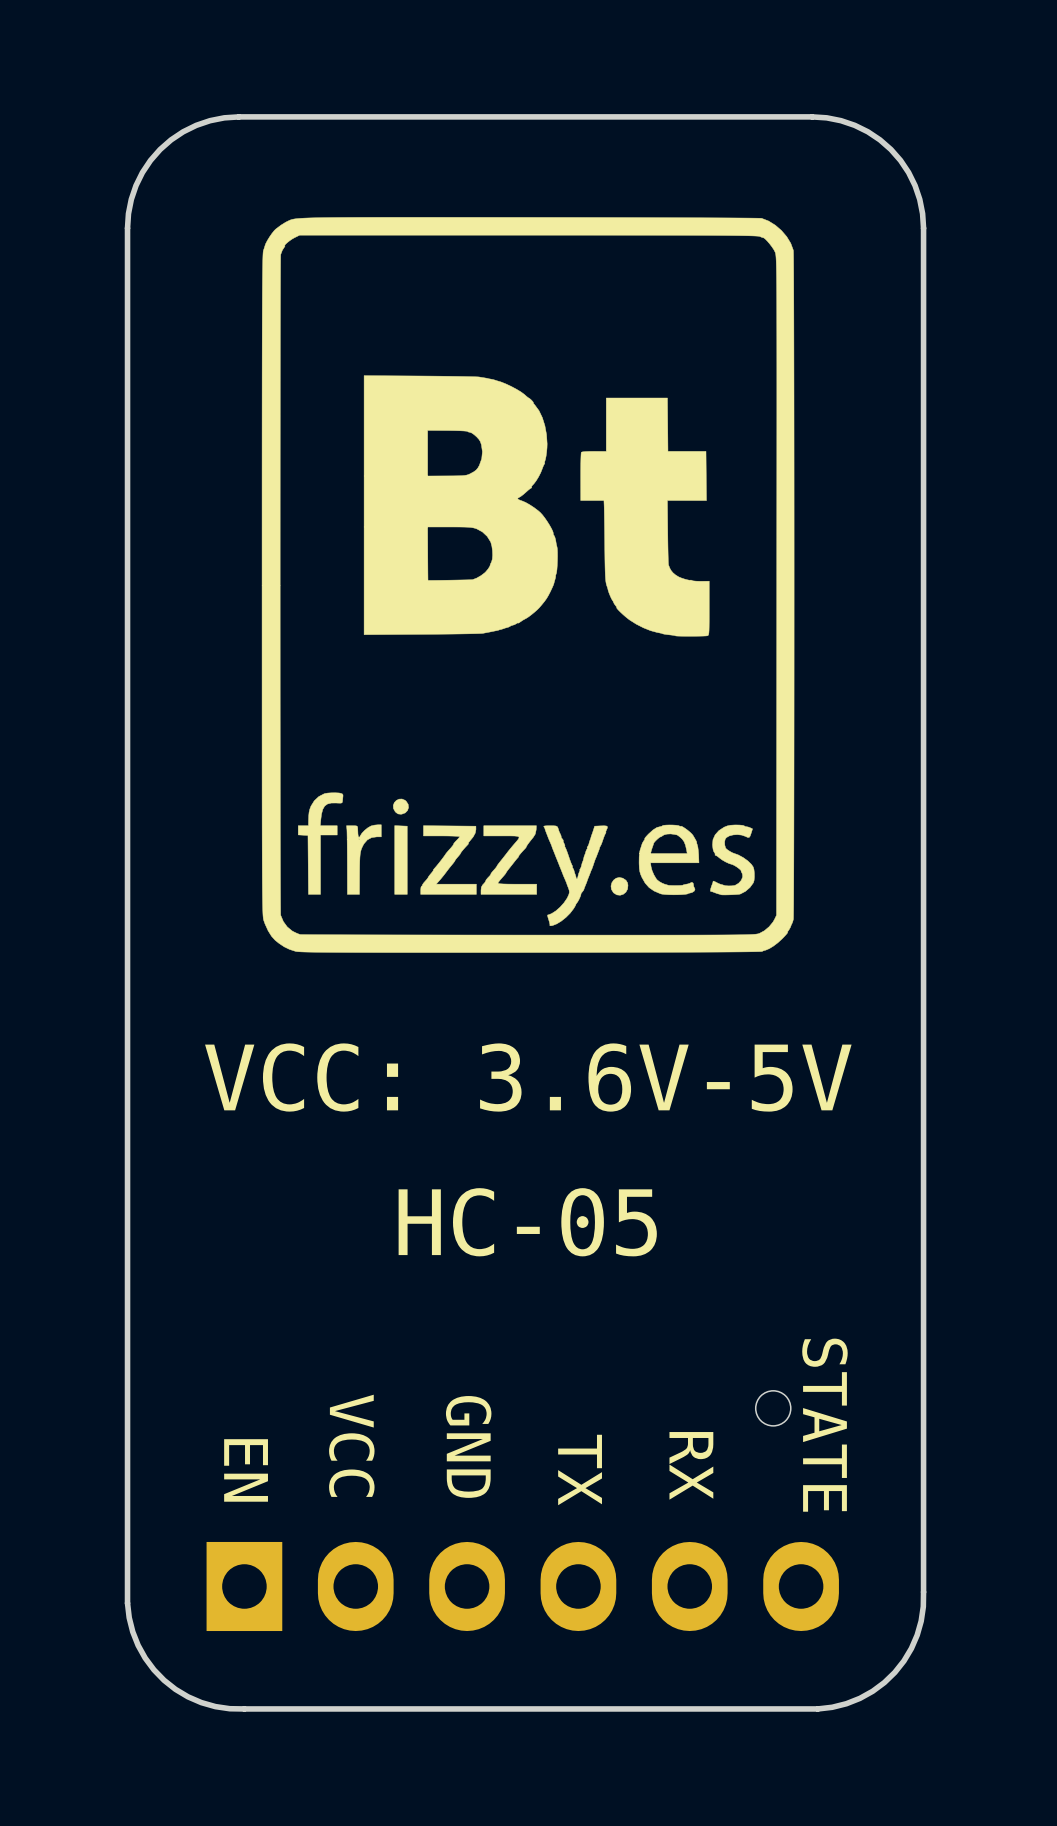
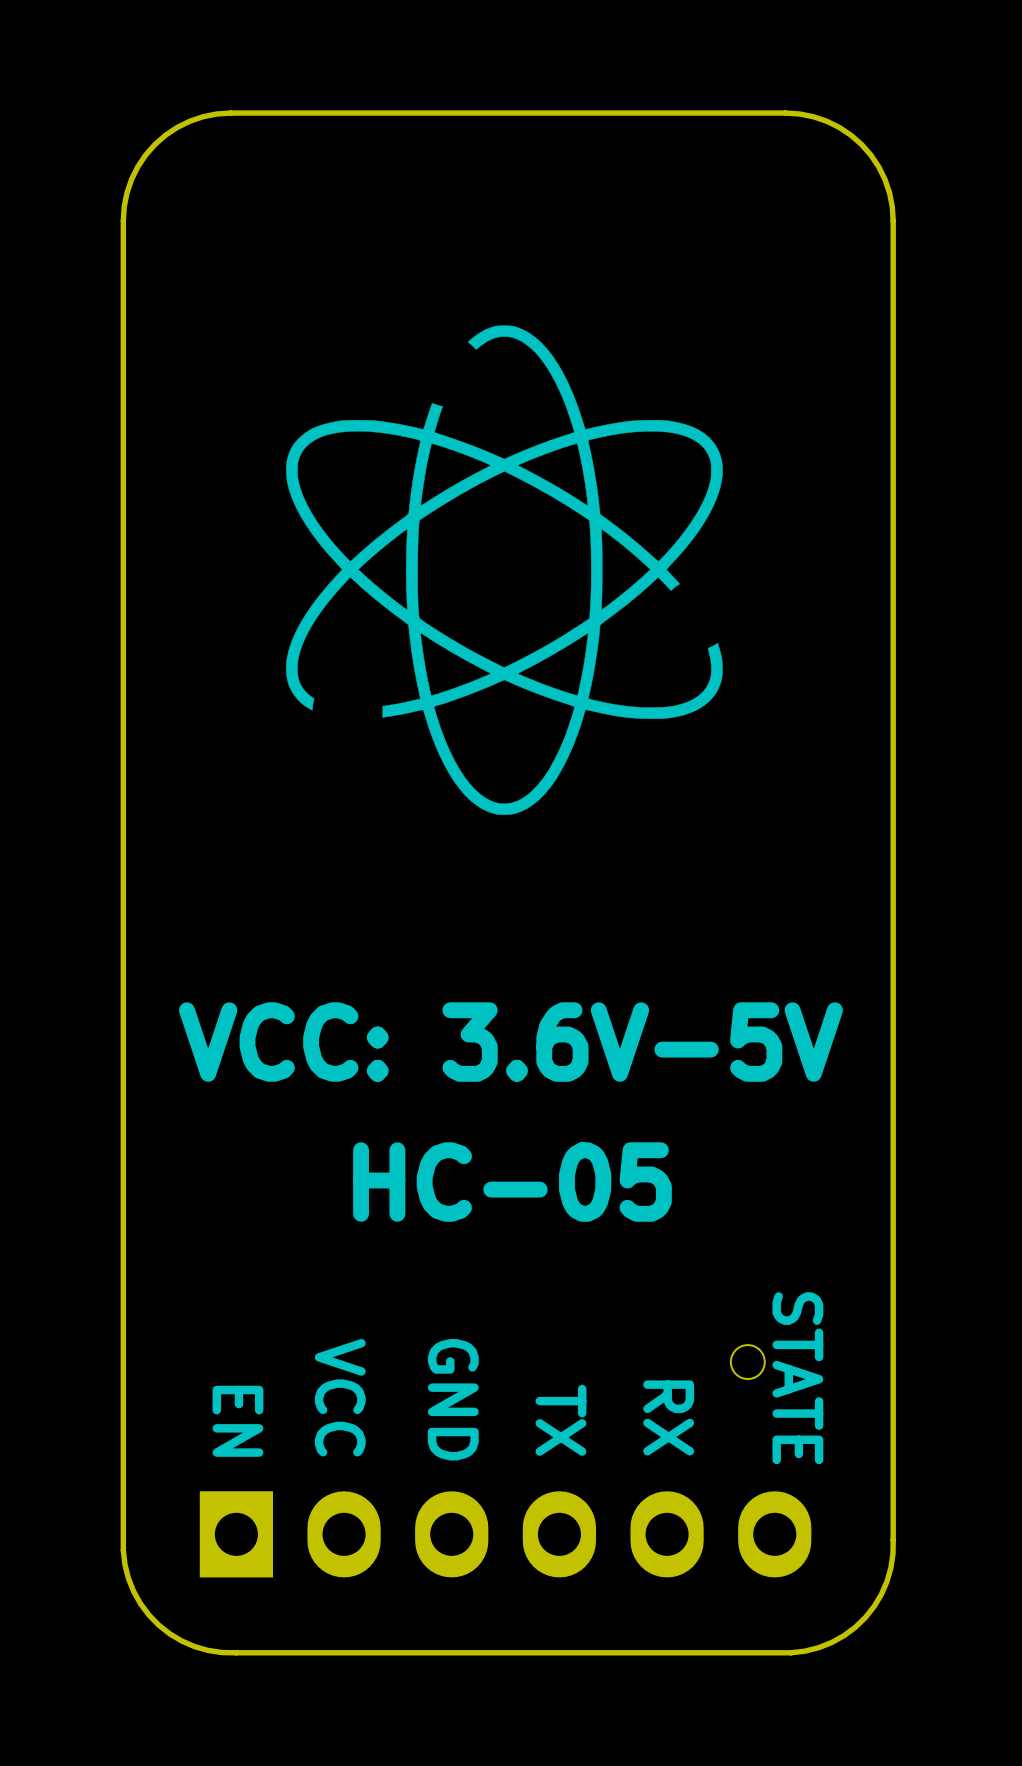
drawing shape: [261, 217, 795, 953] -> [285, 325, 723, 815]

